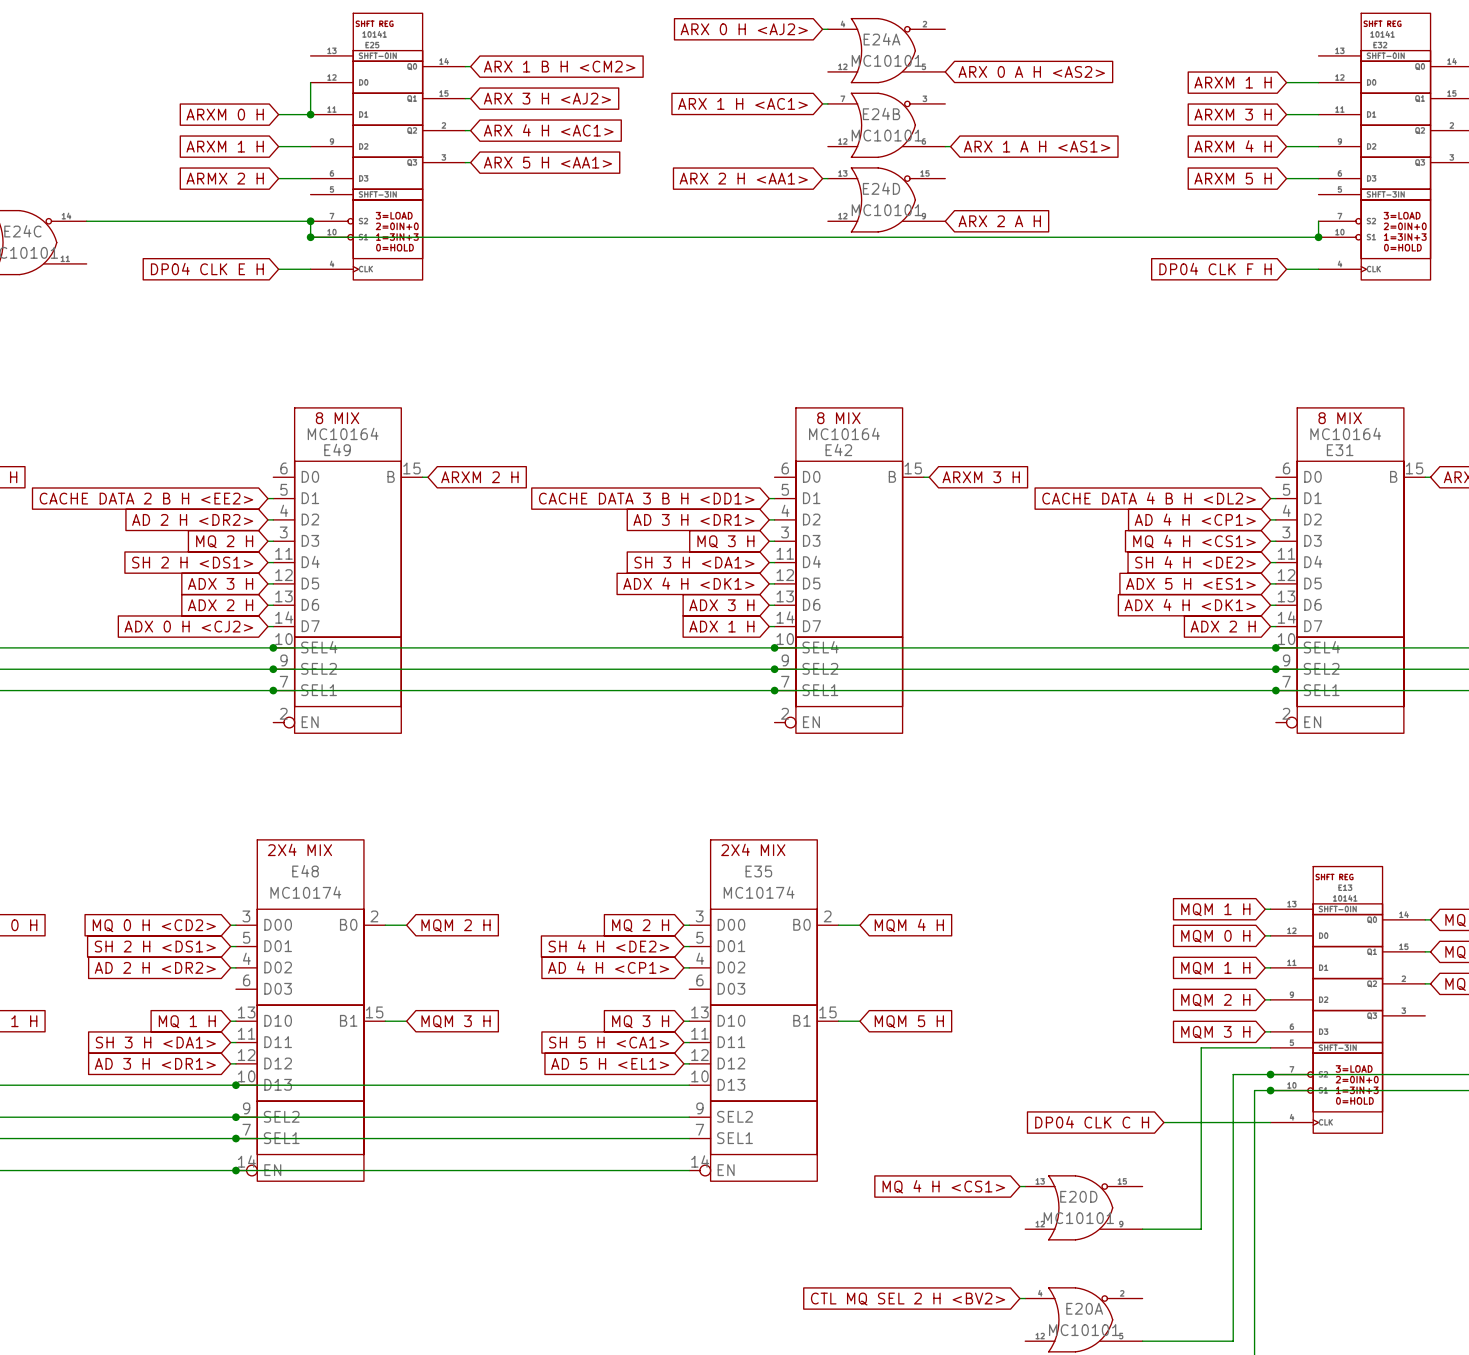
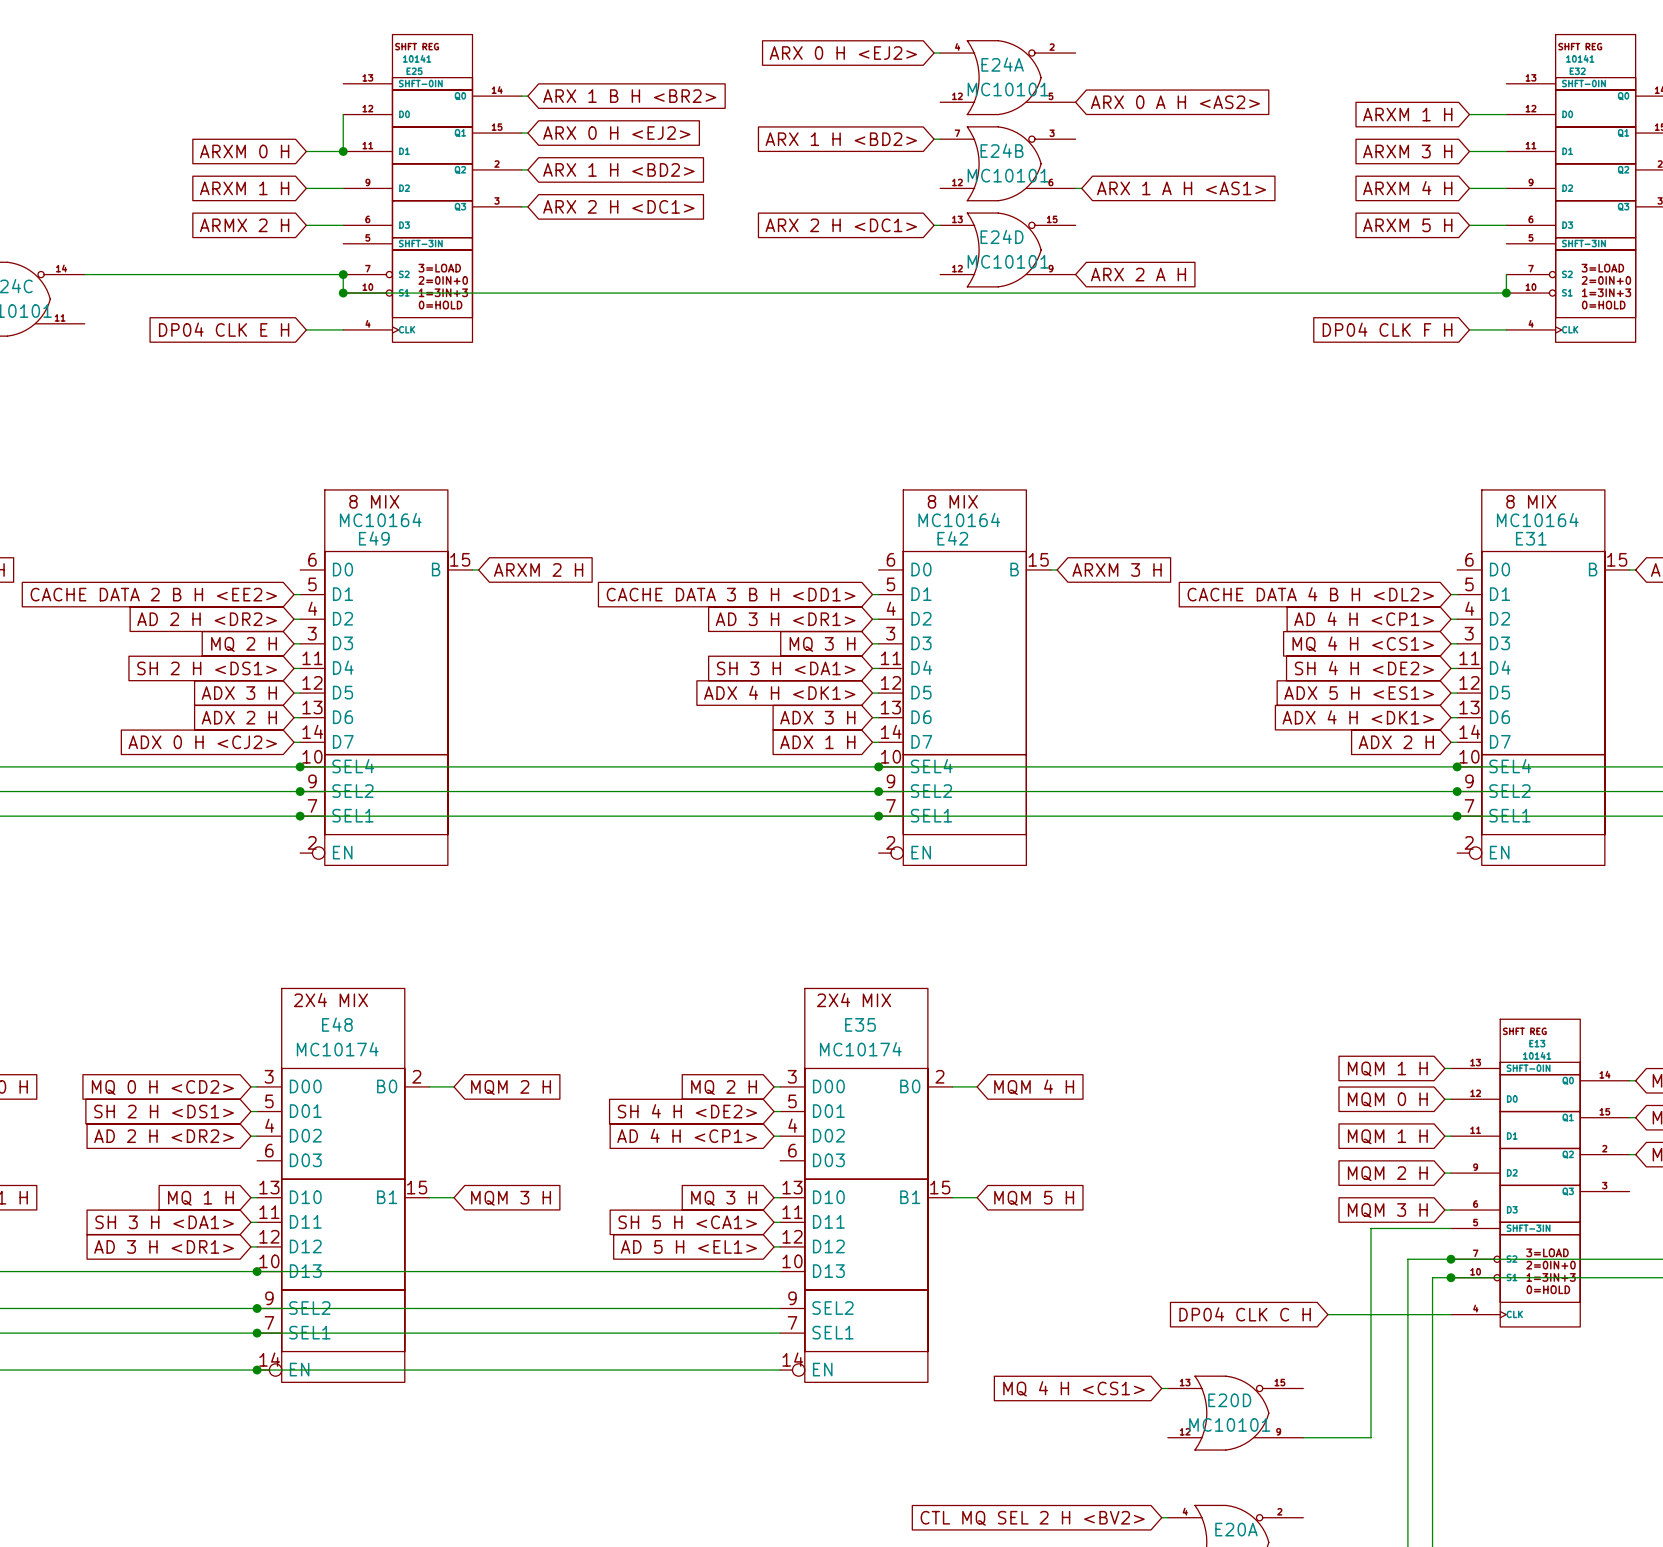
global label: ARX 0 H <AJ2> (744, 29) -> ARX 0 H <EJ2> (843, 53)
global label: ARX 1 B H <CM2> (559, 66) -> ARX 1 B H <BR2> (629, 96)
global label: ARX 3 H <AJ2> (547, 98) -> ARX 0 H <EJ2> (616, 133)
global label: ARX 1 H <AC1> (742, 103) -> ARX 1 H <BD2> (841, 139)
global label: ARX 4 H <AC1> (548, 130) -> ARX 1 H <BD2> (618, 169)
global label: ARX 5 H <AA1> (547, 162) -> ARX 2 H <DC1> (618, 206)
global label: ARX 2 H <AA1> (743, 178) -> ARX 2 H <DC1> (841, 225)

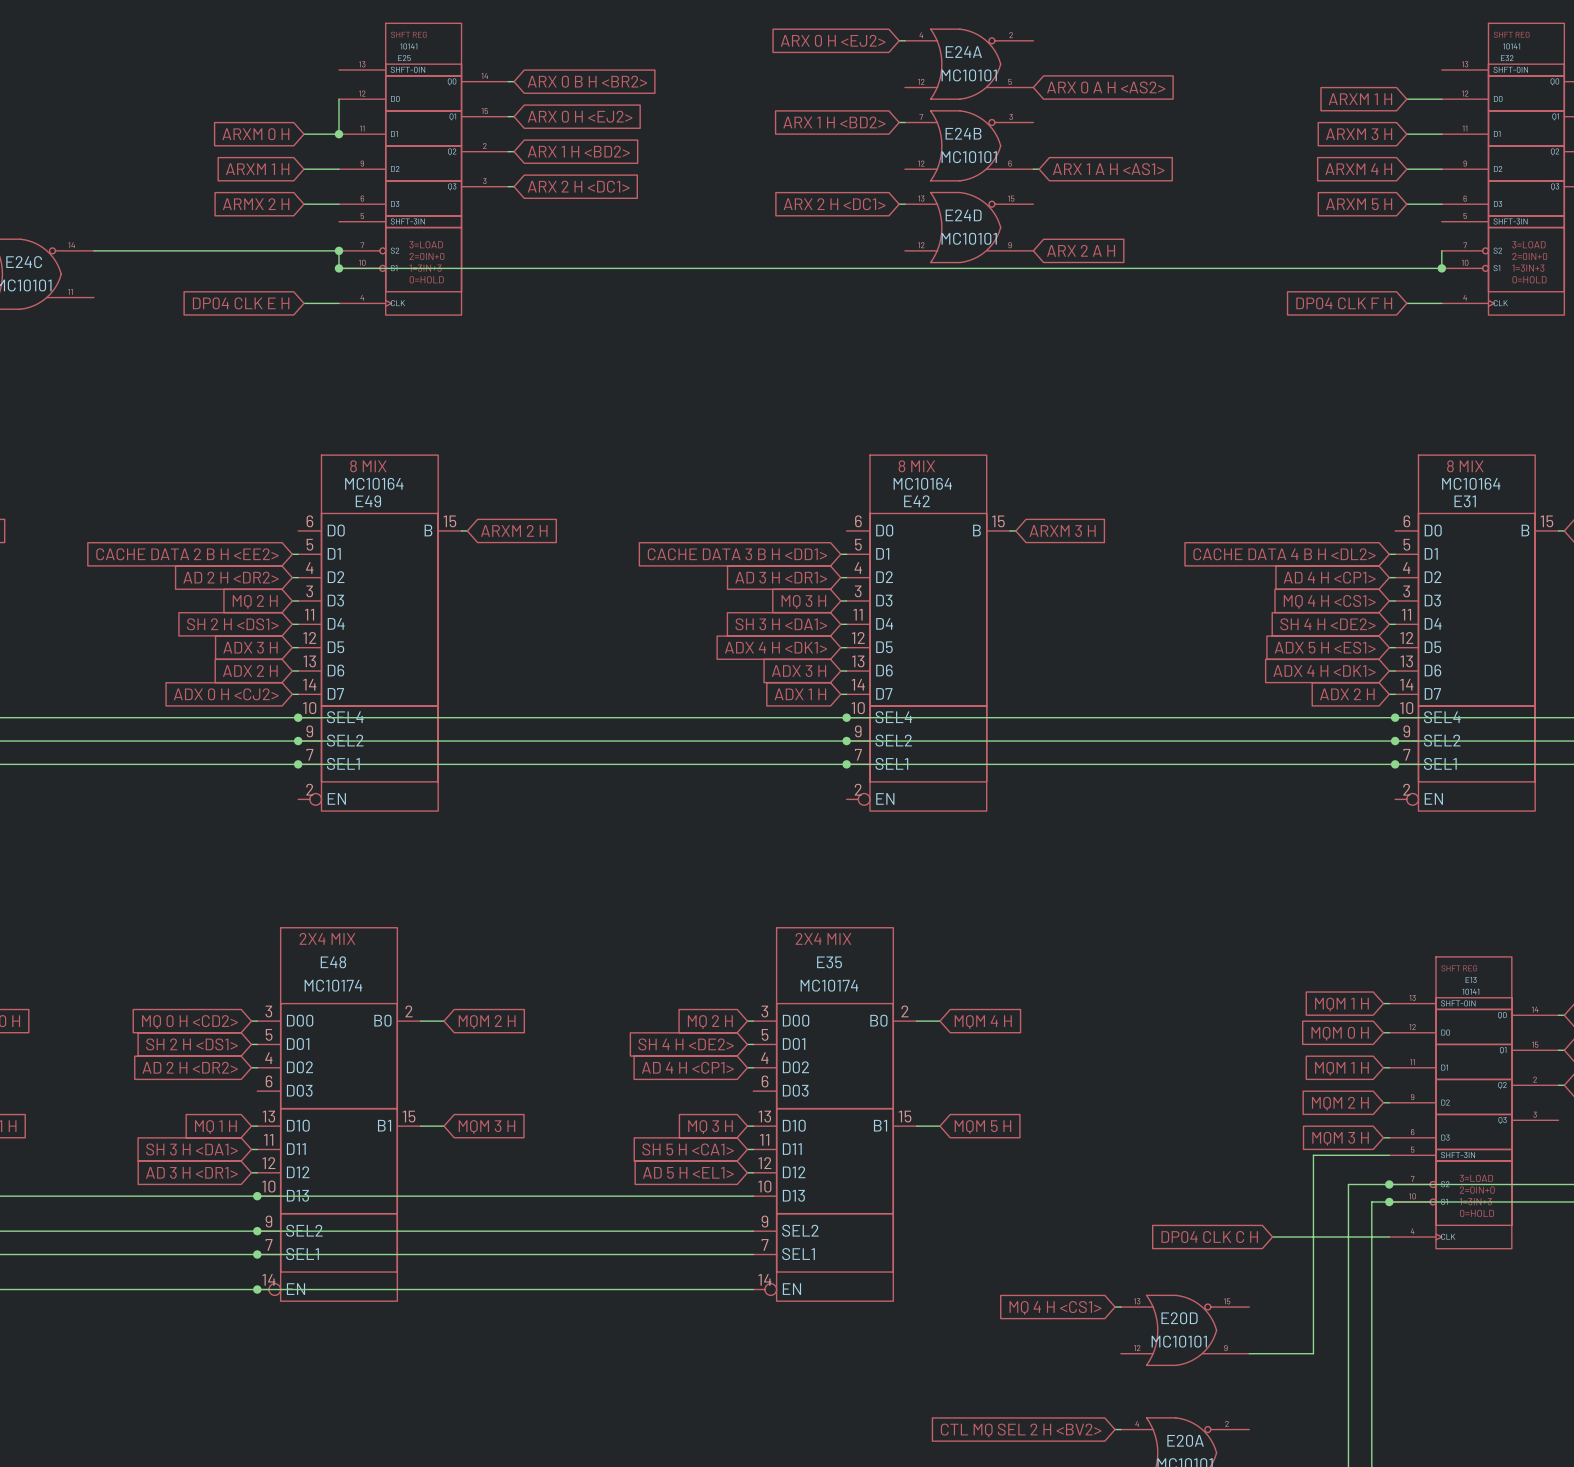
global label: ARX 1 B H <BR2> (629, 96) -> ARX 0 B H <BR2> (587, 81)

